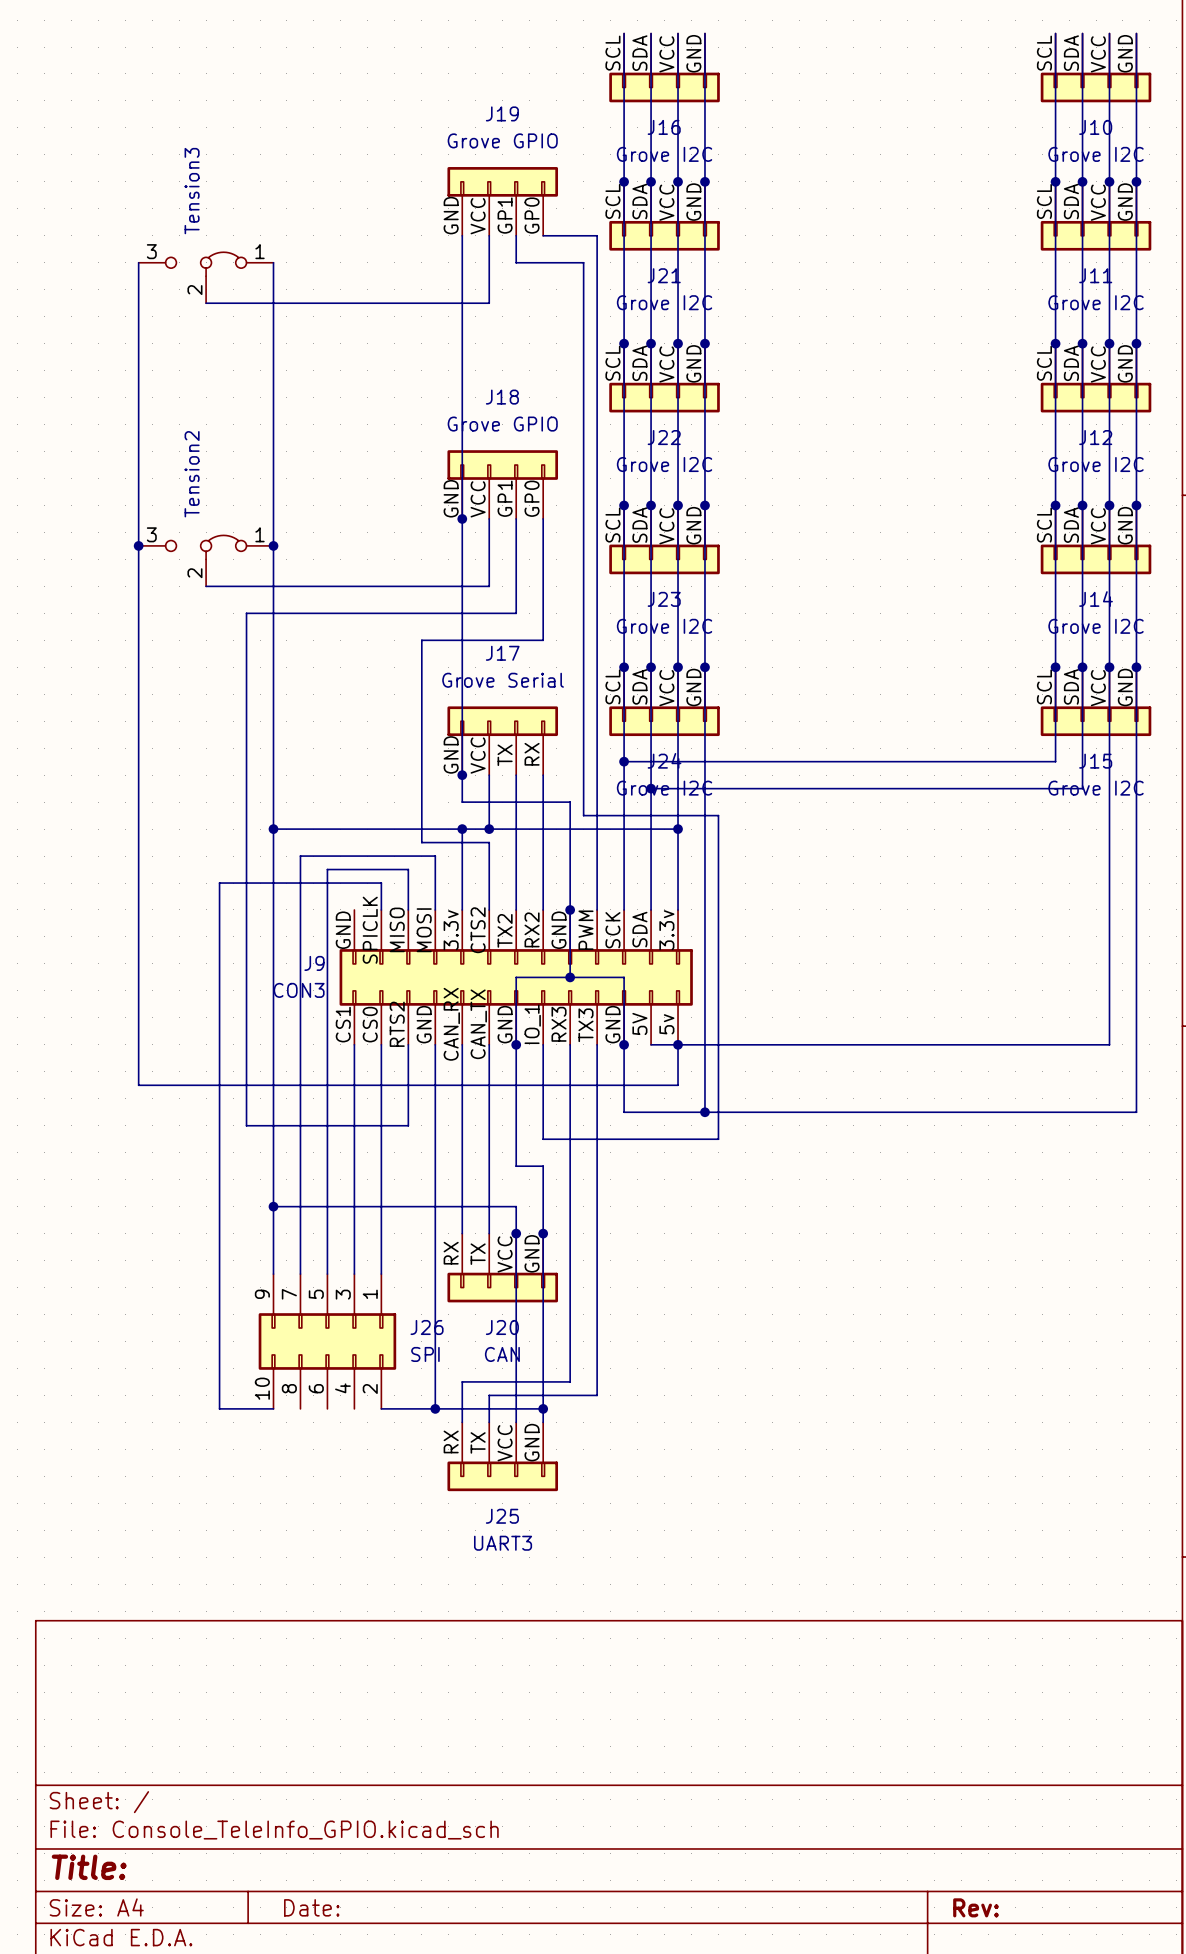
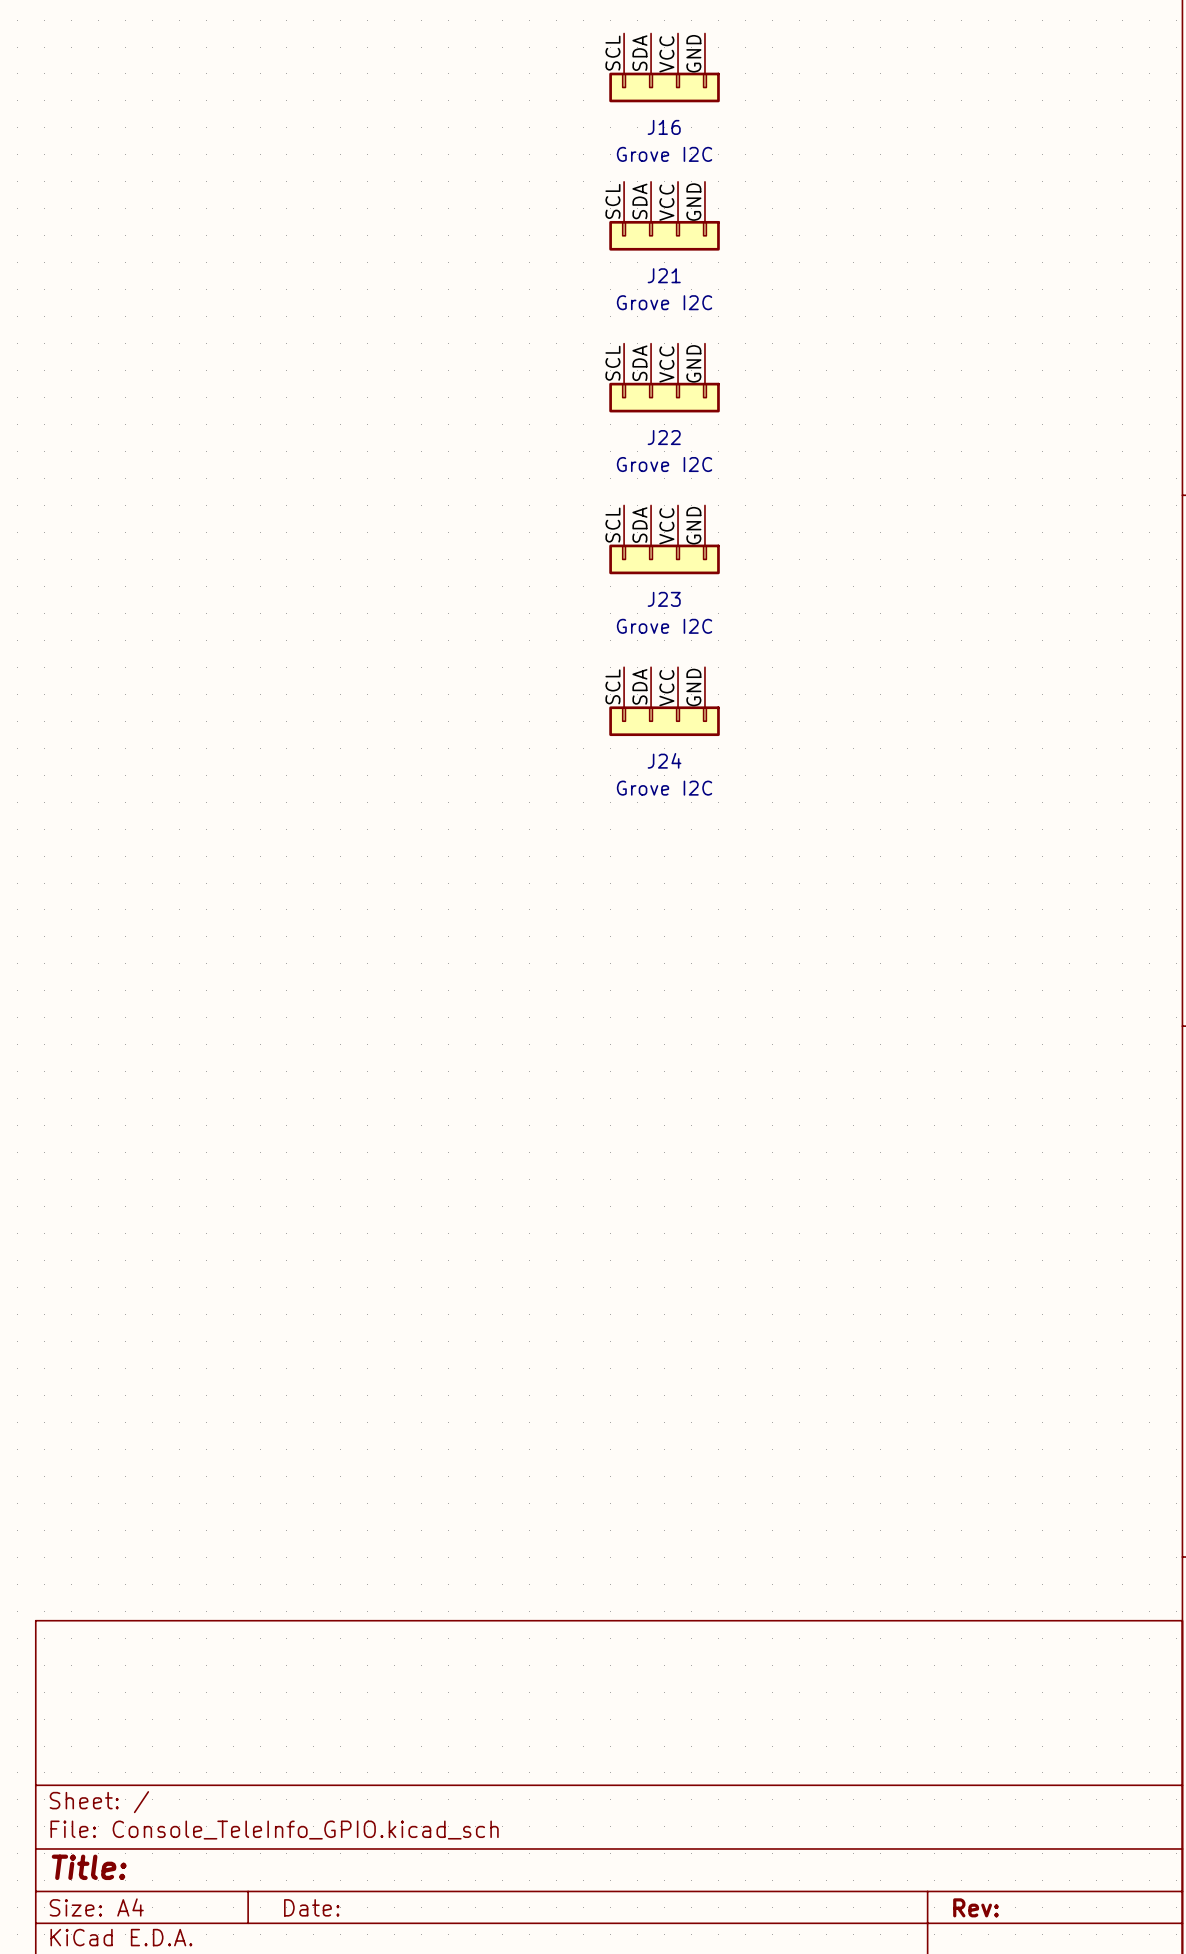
wire: (624, 33) (624, 909) -> none
wire: (651, 33) (651, 909) -> none
wire: (678, 33) (678, 909) -> none
wire: (704, 33) (704, 1112) -> none
wire: (1055, 33) (1055, 761) (624, 761) -> none
wire: (1082, 33) (1082, 788) (651, 788) -> none
wire: (1109, 33) (1109, 1044) (651, 1044) -> none
wire: (1136, 33) (1136, 1112) (624, 1112) (624, 977) (516, 977) (516, 1166) (543, 1166) (543, 1422) -> none
J10: Grove I2C (1096, 67) -> none
junction: (624, 181) -> none
junction: (651, 181) -> none
junction: (678, 181) -> none
junction: (704, 181) -> none
junction: (1055, 181) -> none
junction: (1082, 181) -> none
junction: (1109, 181) -> none
junction: (1136, 181) -> none
J19: Grove GPIO (502, 201) -> none
J11: Grove I2C (1096, 216) -> none
wire: (462, 235) (462, 802) (570, 802) (570, 977) -> none
wire: (489, 235) (489, 303) (206, 303) -> none
wire: (516, 235) (516, 262) (583, 262) (583, 815) (718, 815) (718, 1139) (543, 1139) (543, 1044) -> none
wire: (543, 235) (597, 235) (597, 909) -> none
wire: (138, 262) (138, 1085) (678, 1085) (678, 1044) -> none
wire: (273, 262) (273, 1274) -> none
Tension3: (206, 277) -> none
junction: (624, 343) -> none
junction: (651, 343) -> none
junction: (678, 343) -> none
junction: (704, 343) -> none
junction: (1055, 343) -> none
junction: (1082, 343) -> none
junction: (1109, 343) -> none
junction: (1136, 343) -> none
J12: Grove I2C (1096, 378) -> none
J18: Grove GPIO (502, 484) -> none
junction: (624, 505) -> none
junction: (651, 505) -> none
junction: (678, 505) -> none
junction: (704, 505) -> none
junction: (1055, 505) -> none
junction: (1082, 505) -> none
junction: (1109, 505) -> none
junction: (1136, 505) -> none
junction: (462, 518) -> none
wire: (489, 518) (489, 586) (206, 586) -> none
wire: (516, 518) (516, 613) (246, 613) (246, 1125) (408, 1125) (408, 1044) -> none
wire: (543, 518) (543, 640) (421, 640) (421, 842) (489, 842) (489, 909) -> none
J14: Grove I2C (1096, 539) -> none
junction: (138, 545) -> none
junction: (273, 545) -> none
Tension2: (206, 560) -> none
junction: (624, 667) -> none
junction: (651, 667) -> none
junction: (678, 667) -> none
junction: (704, 667) -> none
junction: (1055, 667) -> none
junction: (1082, 667) -> none
junction: (1109, 667) -> none
junction: (1136, 667) -> none
J15: Grove I2C (1096, 701) -> none
J17: Grove Serial (502, 740) -> none
junction: (624, 761) -> none
junction: (462, 775) -> none
wire: (489, 775) (489, 829) -> none
wire: (516, 775) (516, 909) -> none
wire: (543, 775) (543, 909) -> none
junction: (651, 788) -> none
wire: (273, 829) (678, 829) -> none
junction: (273, 829) -> none
wire: (462, 829) (462, 909) -> none
junction: (462, 829) -> none
junction: (489, 829) -> none
junction: (678, 829) -> none
wire: (381, 909) (381, 883) (219, 883) (219, 1408) (273, 1408) -> none
wire: (408, 909) (408, 869) (327, 869) (327, 1274) -> none
wire: (435, 909) (435, 856) (300, 856) (300, 1274) -> none
junction: (570, 909) -> none
J9: CON3 (516, 977) -> none
junction: (570, 977) -> none
wire: (354, 1044) (354, 1274) -> none
wire: (381, 1044) (381, 1274) -> none
wire: (435, 1044) (435, 1408) -> none
wire: (462, 1044) (462, 1233) -> none
wire: (489, 1044) (489, 1233) -> none
junction: (516, 1044) -> none
wire: (570, 1044) (570, 1381) (462, 1381) (462, 1422) -> none
wire: (597, 1044) (597, 1395) (489, 1395) (489, 1422) -> none
junction: (624, 1044) -> none
junction: (678, 1044) -> none
junction: (704, 1112) -> none
wire: (273, 1206) (516, 1206) (516, 1422) -> none
junction: (273, 1206) -> none
junction: (516, 1233) -> none
junction: (543, 1233) -> none
J20: CAN (502, 1267) -> none
J26: SPI (327, 1341) -> none
wire: (381, 1408) (543, 1408) -> none
junction: (435, 1408) -> none
junction: (543, 1408) -> none
J25: UART3 (502, 1456) -> none

